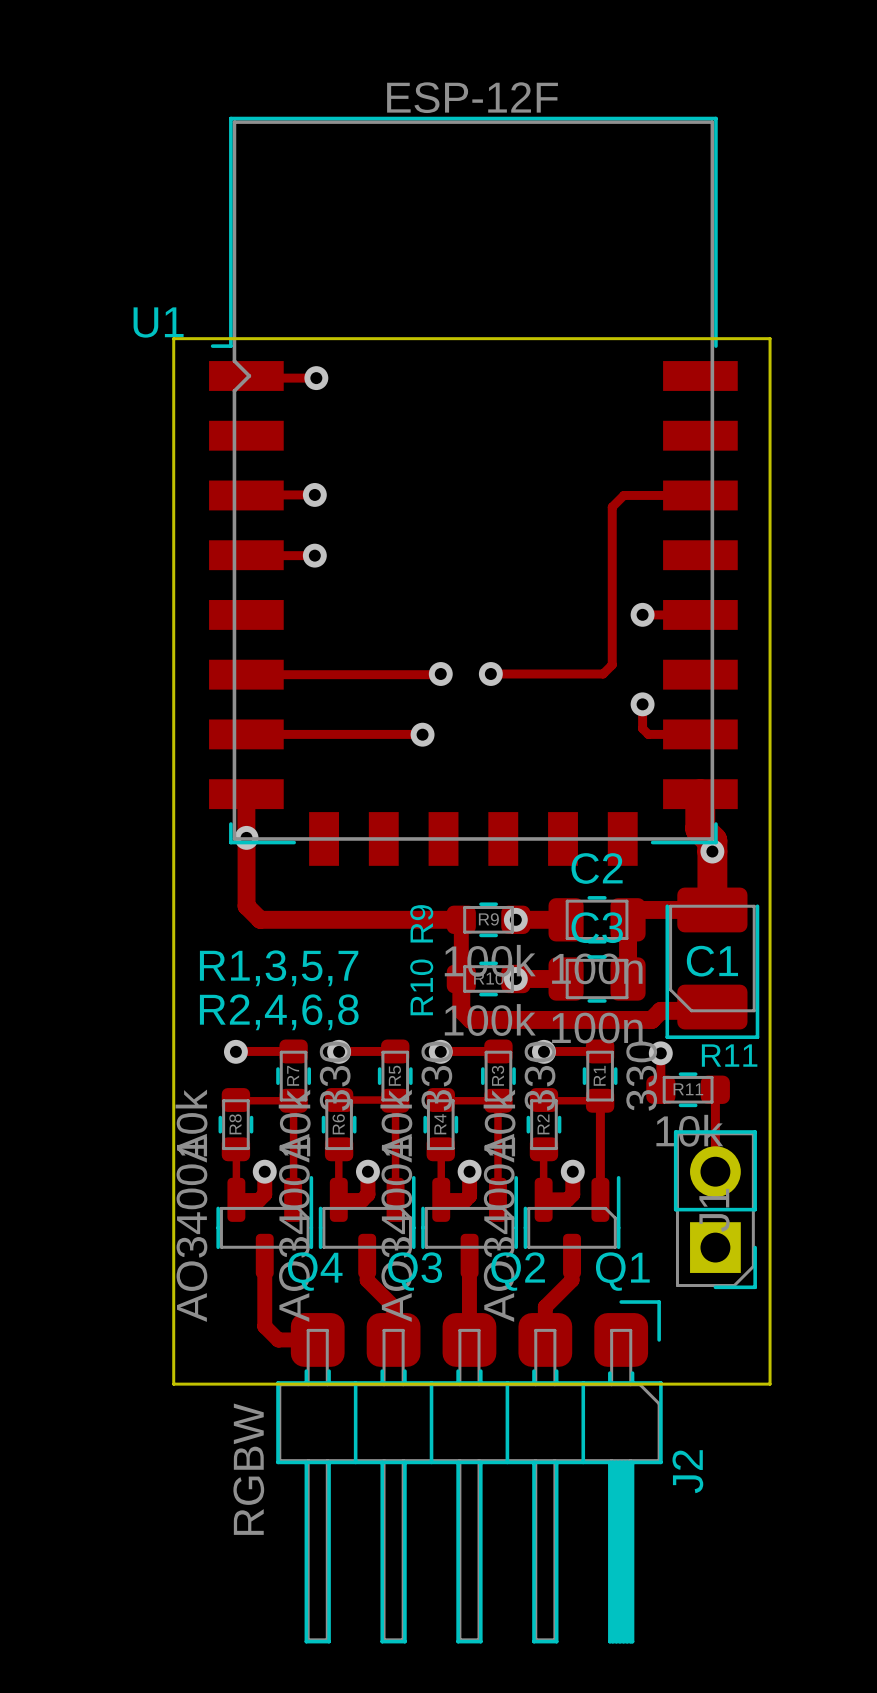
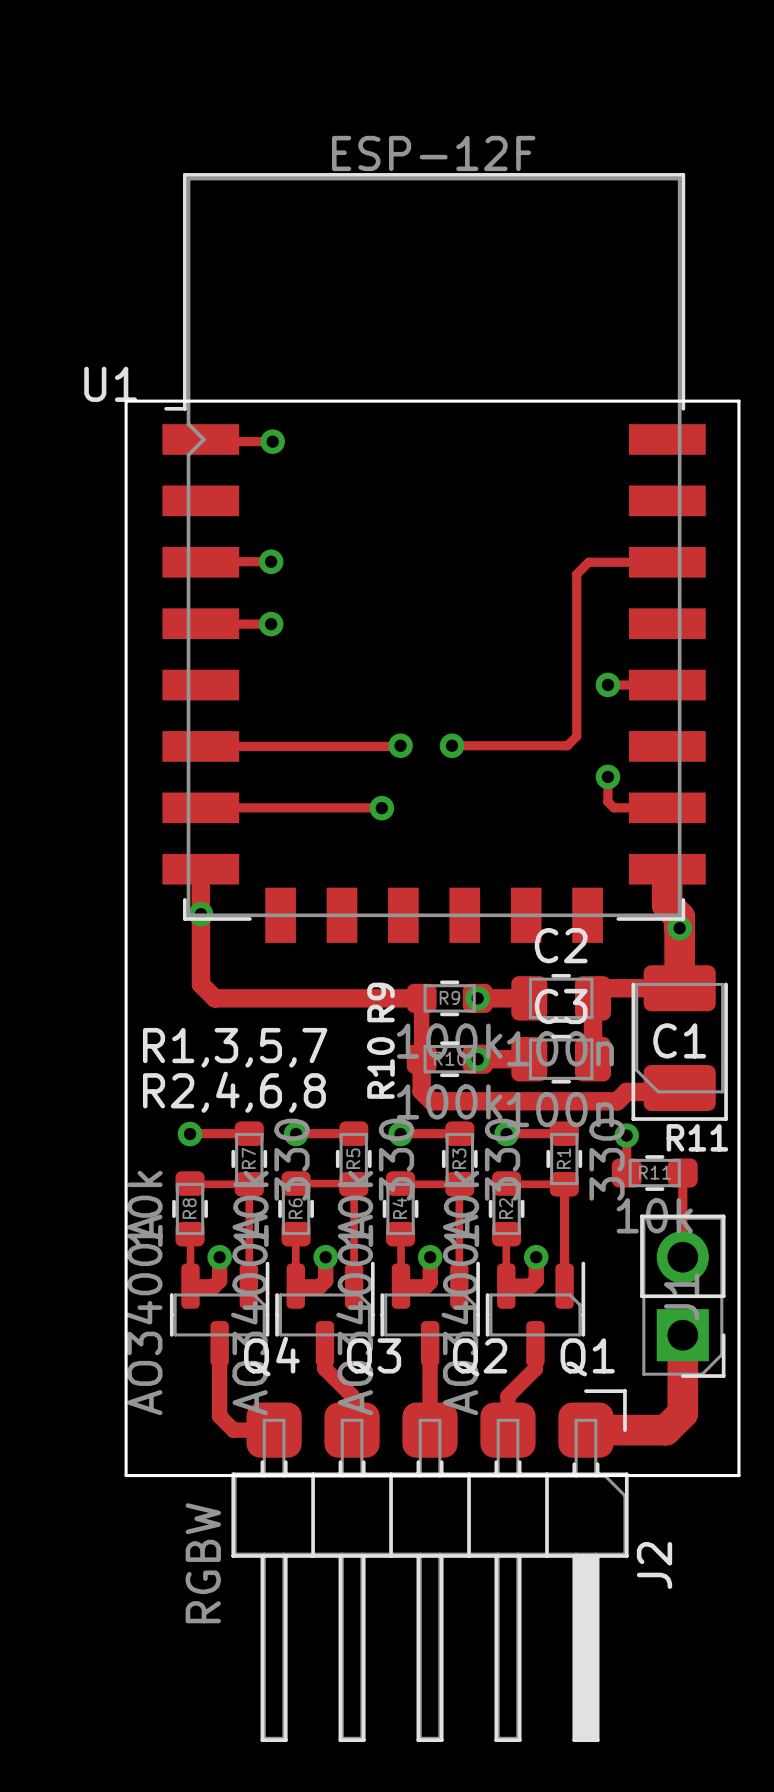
track: none -> (682, 1335) (682, 1413) (665, 1430) (585, 1430)

